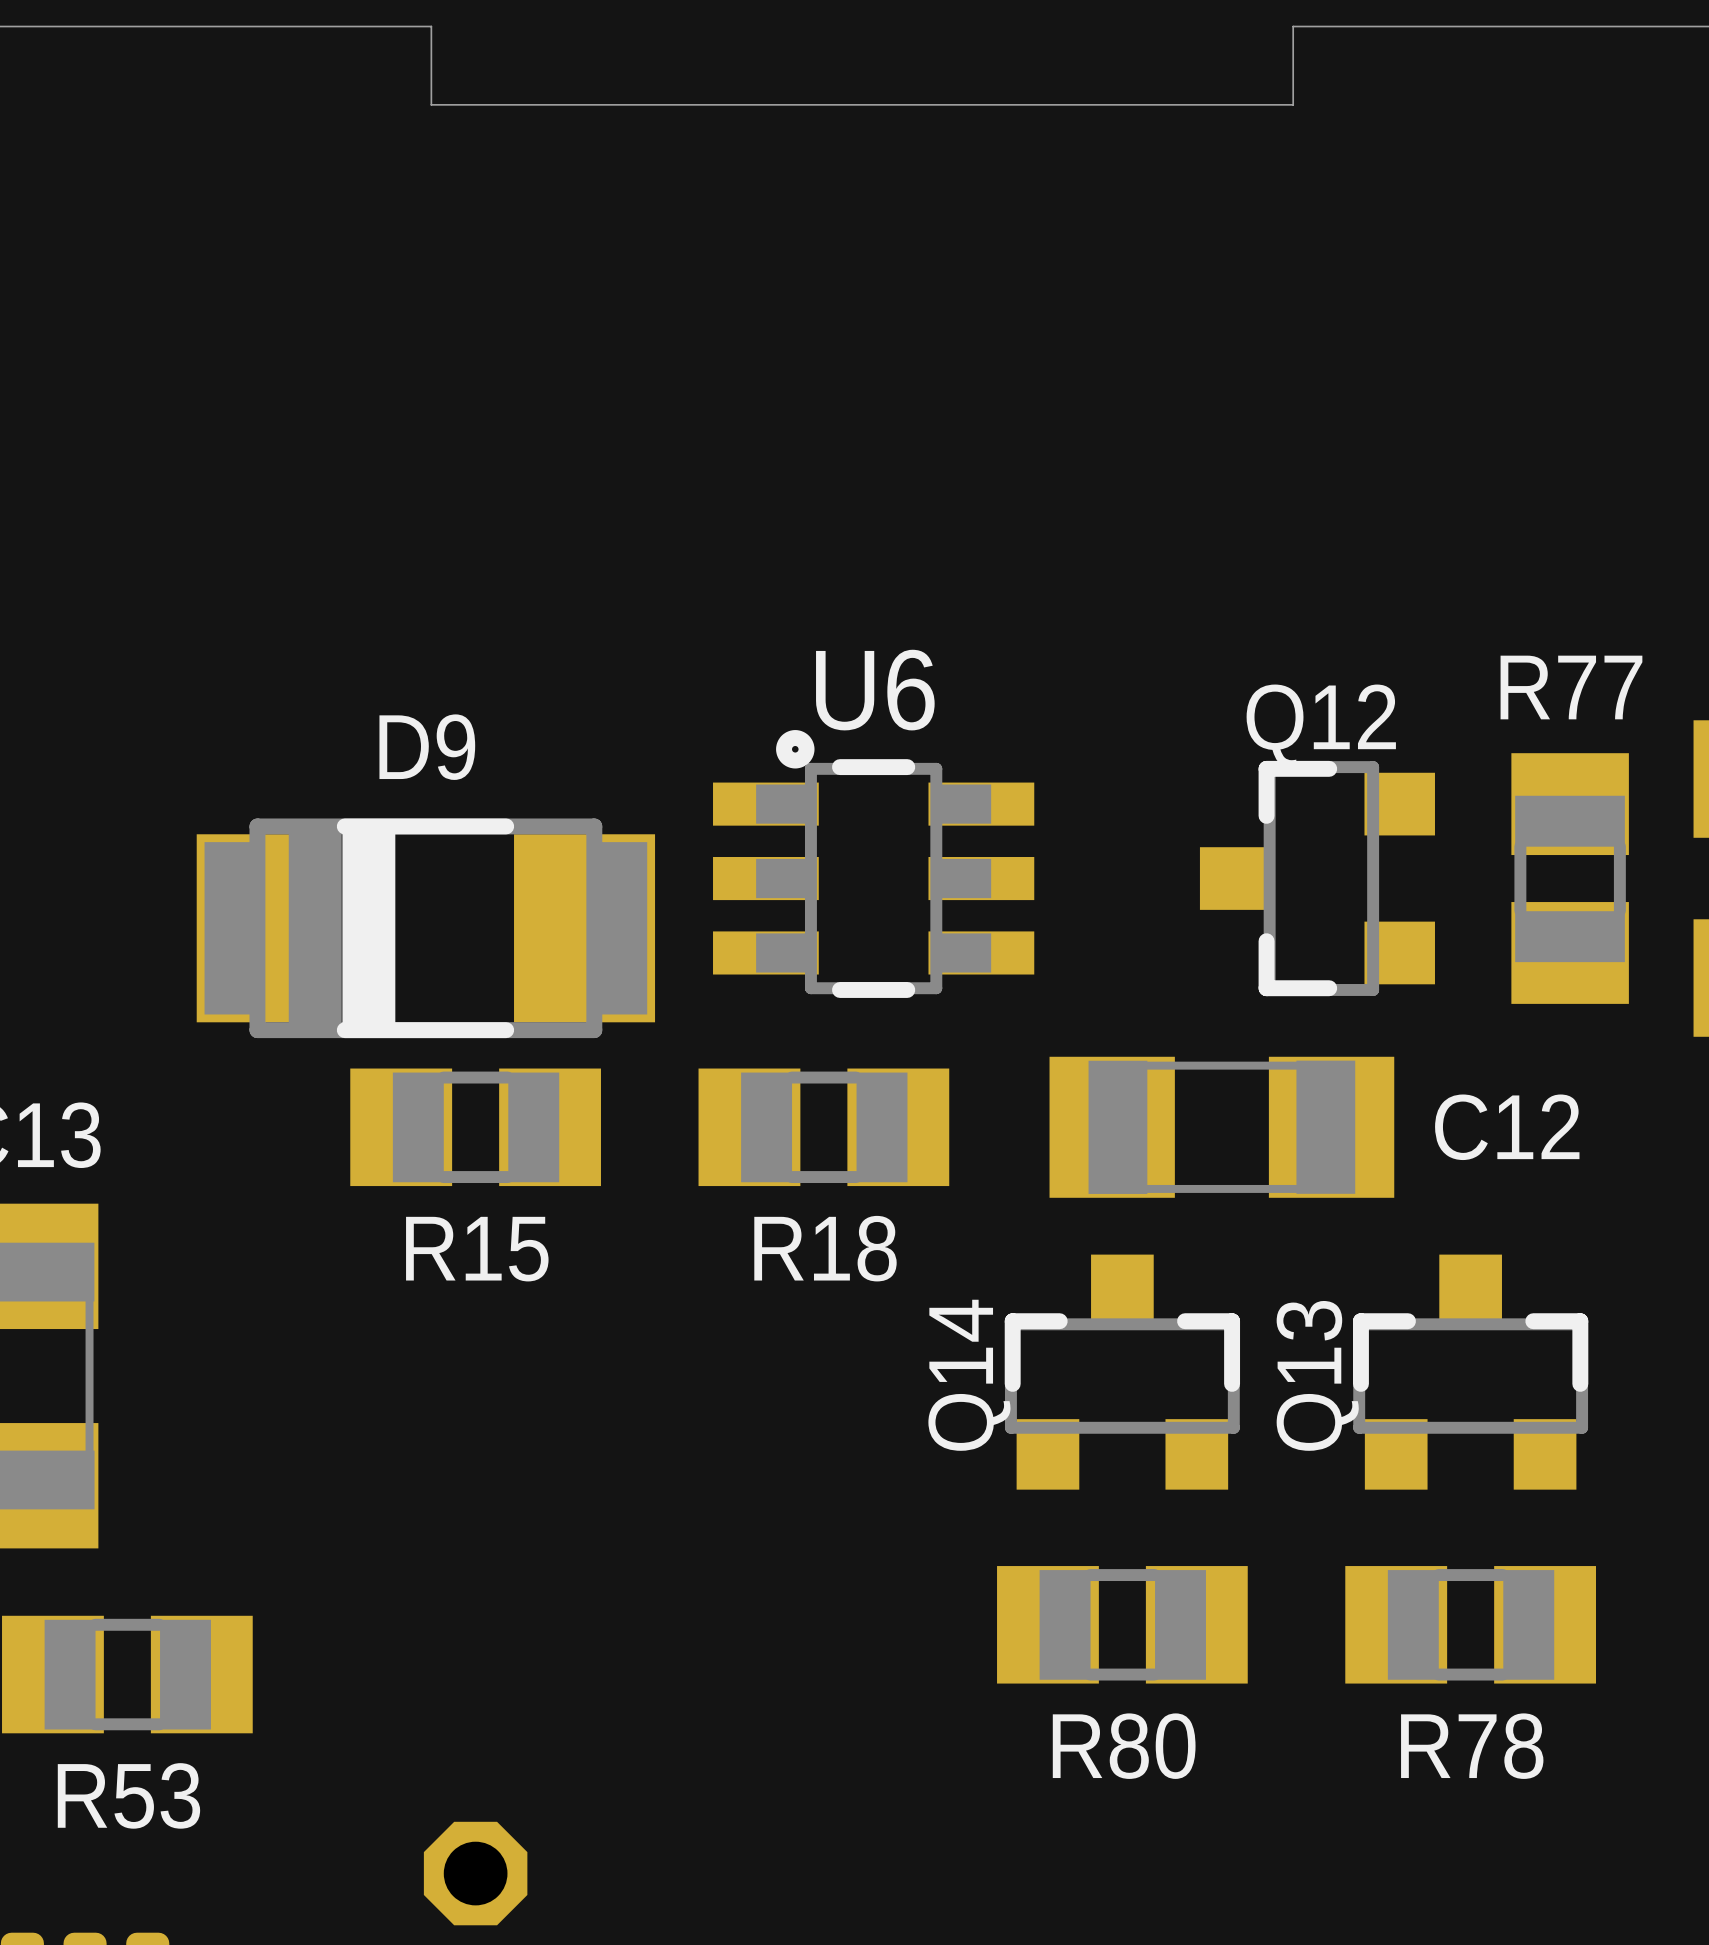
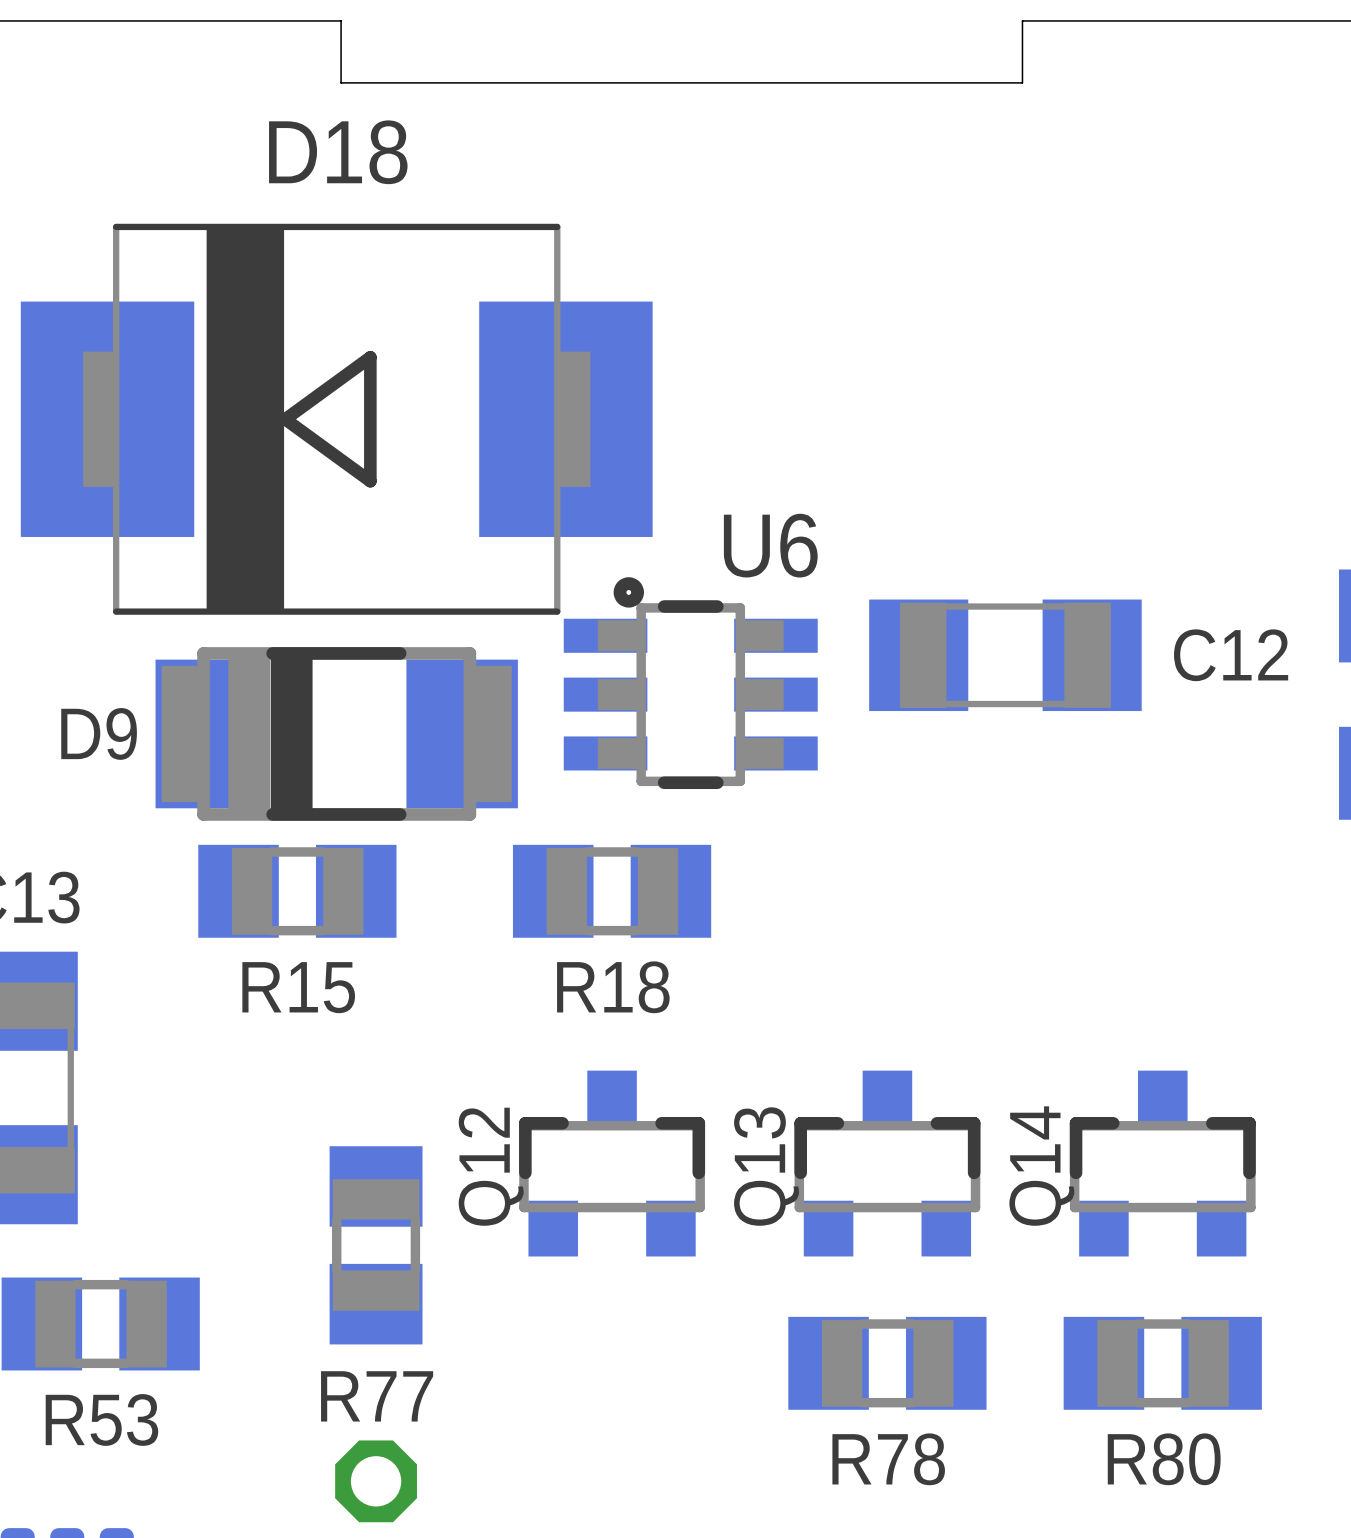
D18: none -> (336, 419)
R77 name position: R77 (1571, 687) -> R77 (377, 1396)
U6 name position: U6 (875, 690) -> U6 (770, 545)
Q12 name position: Q12 (1321, 725) -> Q12 (491, 1166)
D9 name position: D9 (427, 747) -> D9 (99, 733)
Q12 rotation: 0° (1317, 878) -> 90° clockwise (612, 1163)
Q12 position: (1317, 878) -> (612, 1163)
R77 position: (1570, 878) -> (376, 1245)
R15 position: (475, 1127) -> (297, 891)
R18 position: (823, 1127) -> (612, 891)
C12 position: (1221, 1127) -> (1005, 655)
Q14 position: (1122, 1372) -> (1162, 1163)
Q13 position: (1470, 1372) -> (887, 1163)
R80 position: (1122, 1624) -> (1162, 1363)
R78 position: (1470, 1624) -> (887, 1363)

